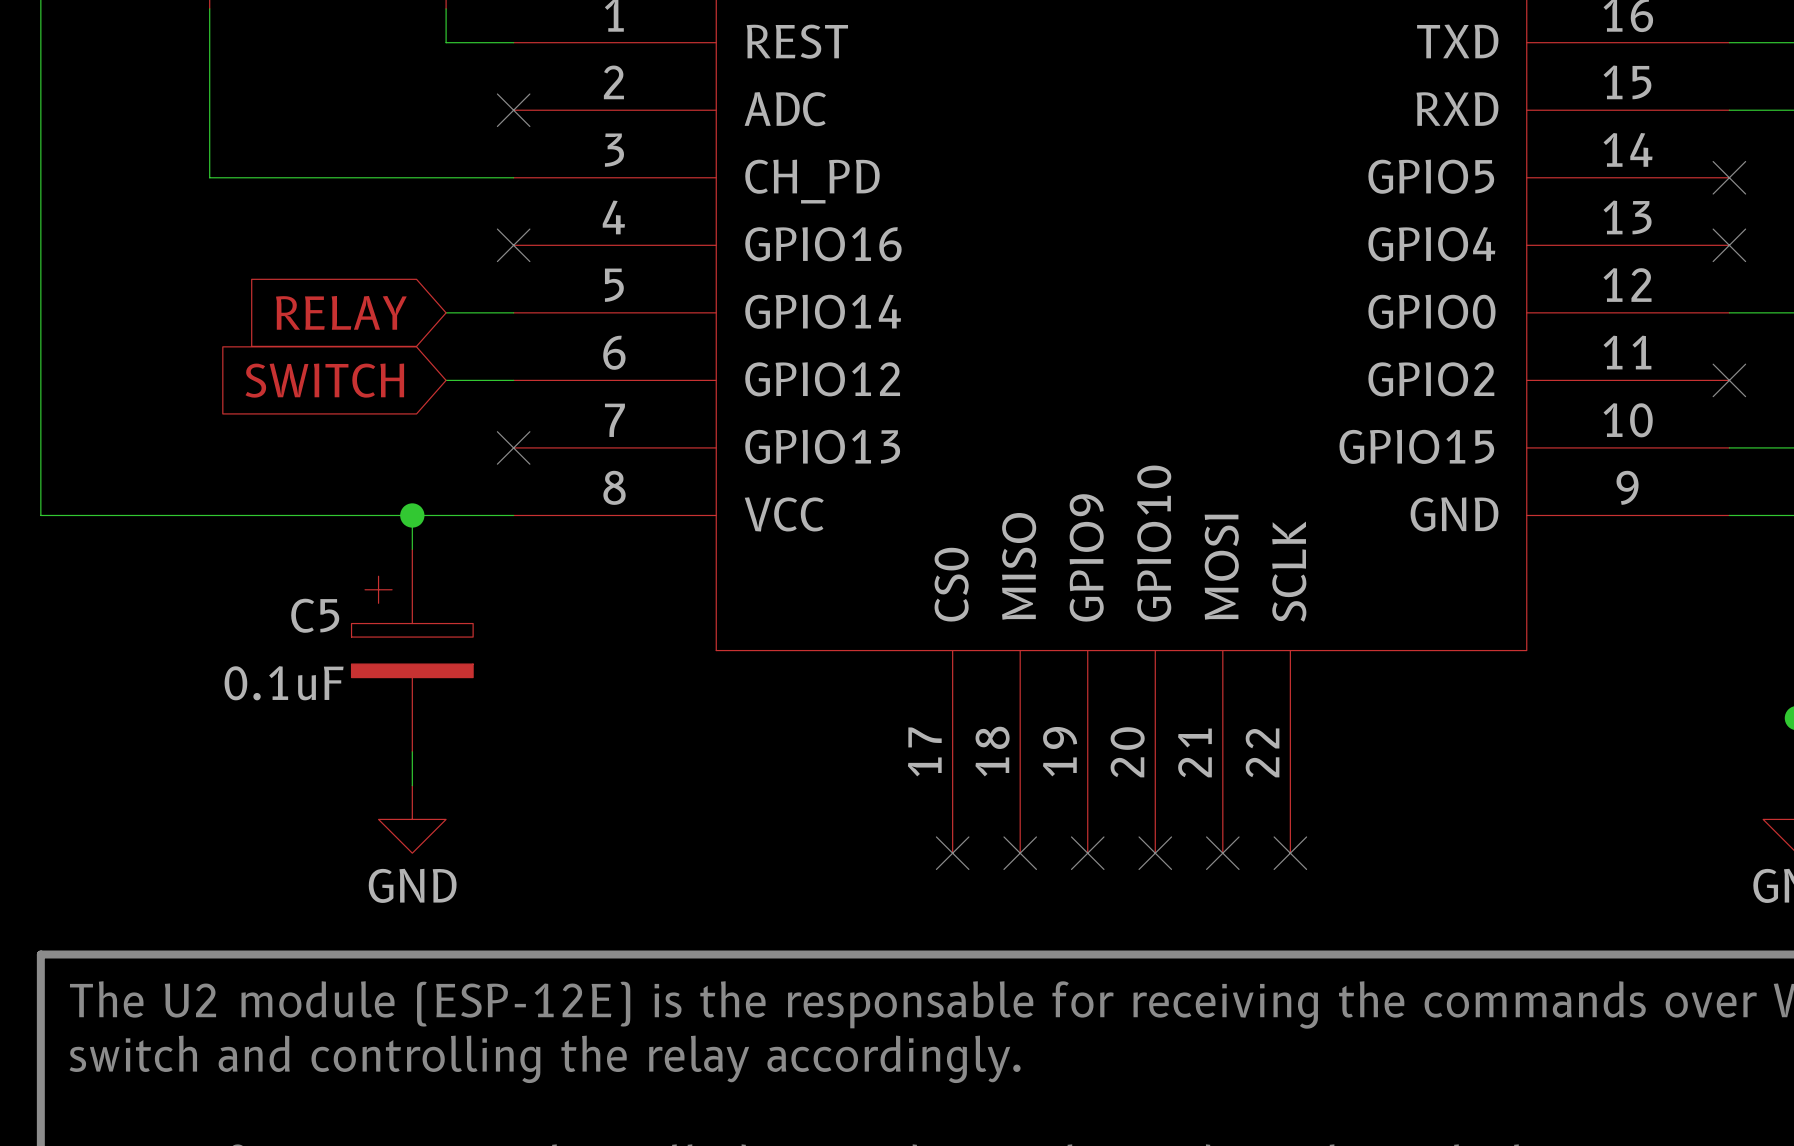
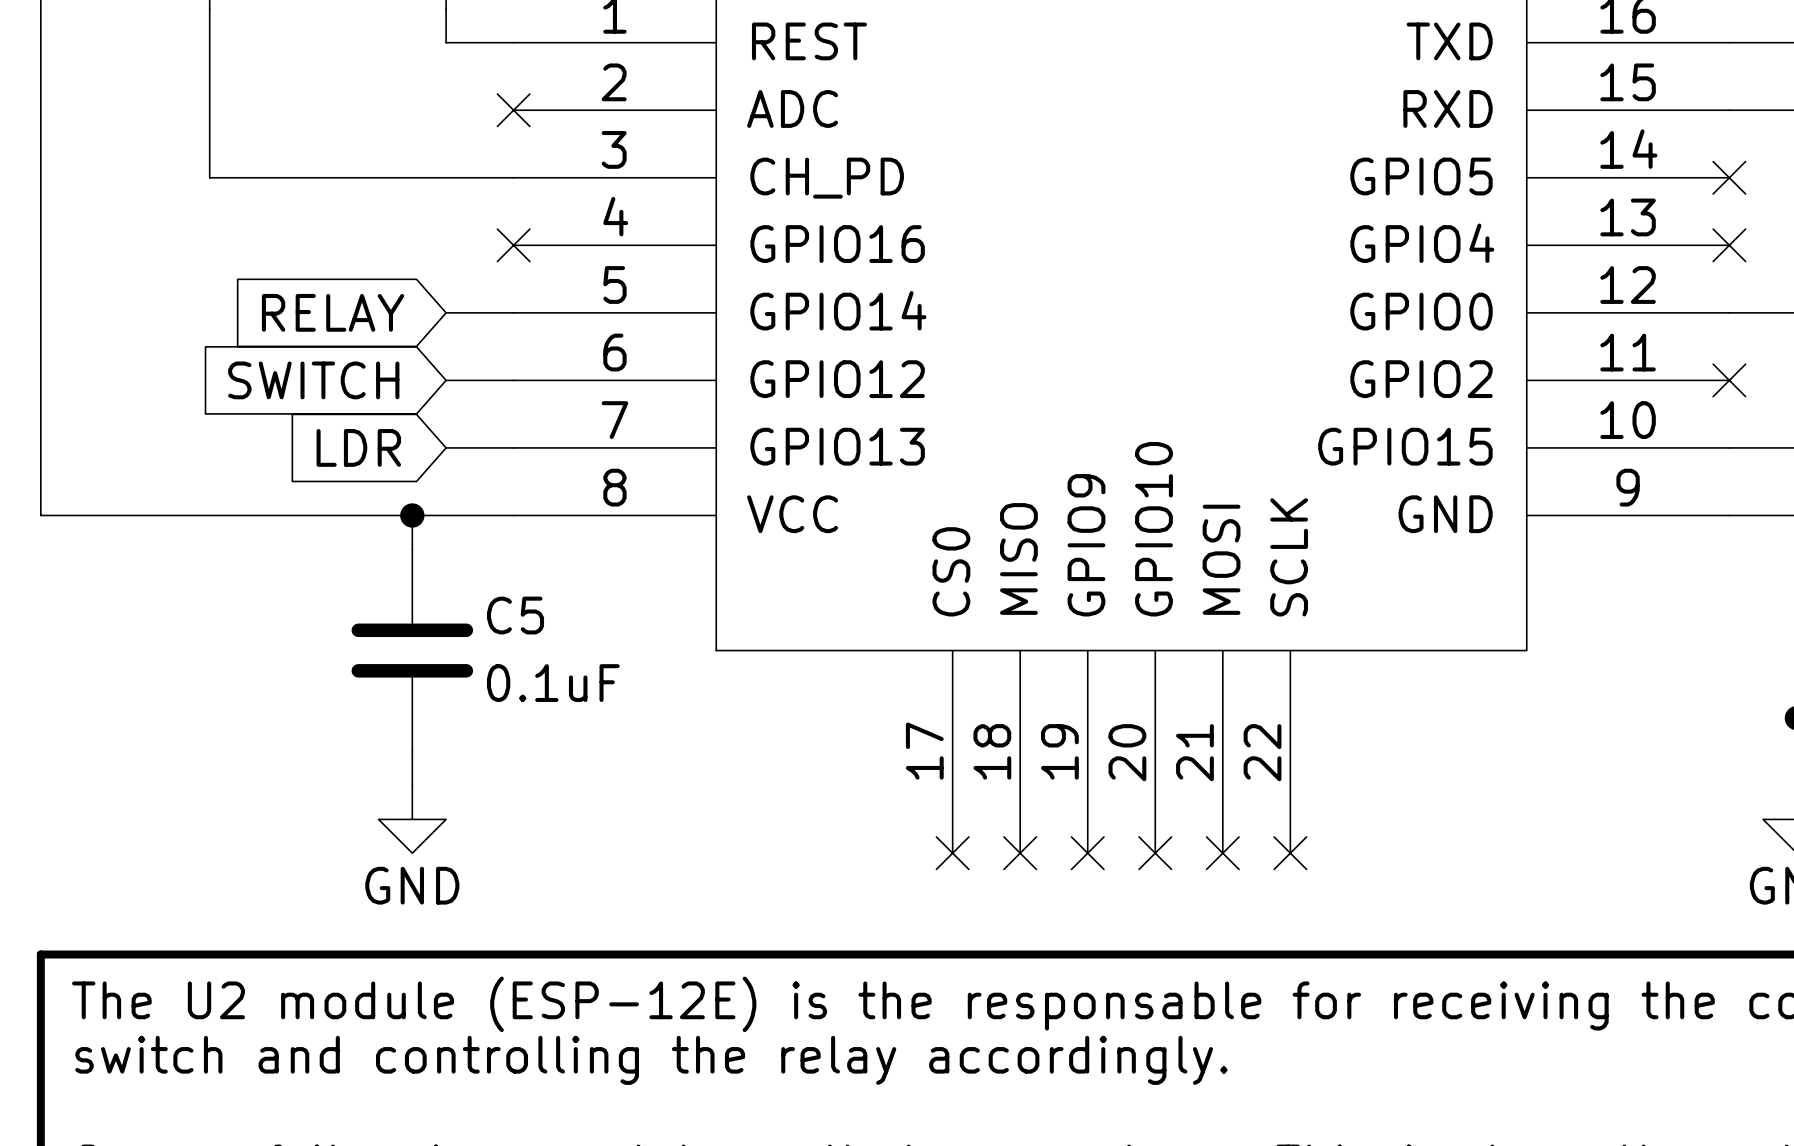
global label: none -> LDR (358, 447)
wire: none -> (446, 447) (513, 447)
no-connect mark: (513, 447) -> none
C5 symbol: [351, 549, 474, 752] -> [351, 549, 474, 752]
C5 name position: C5 (315, 615) -> C5 (515, 615)
C5 value position: 0.1uF (284, 683) -> 0.1uF (553, 683)

